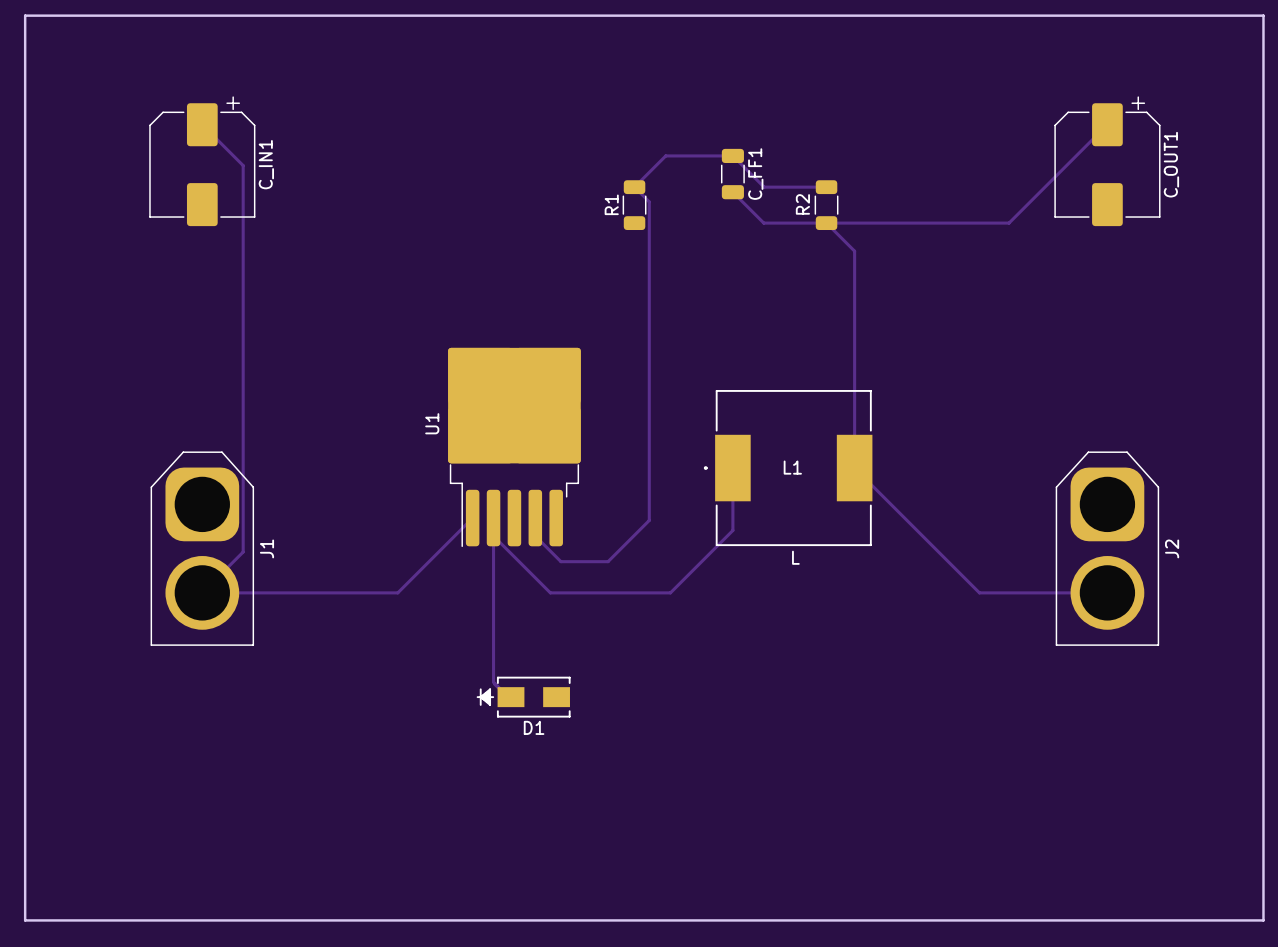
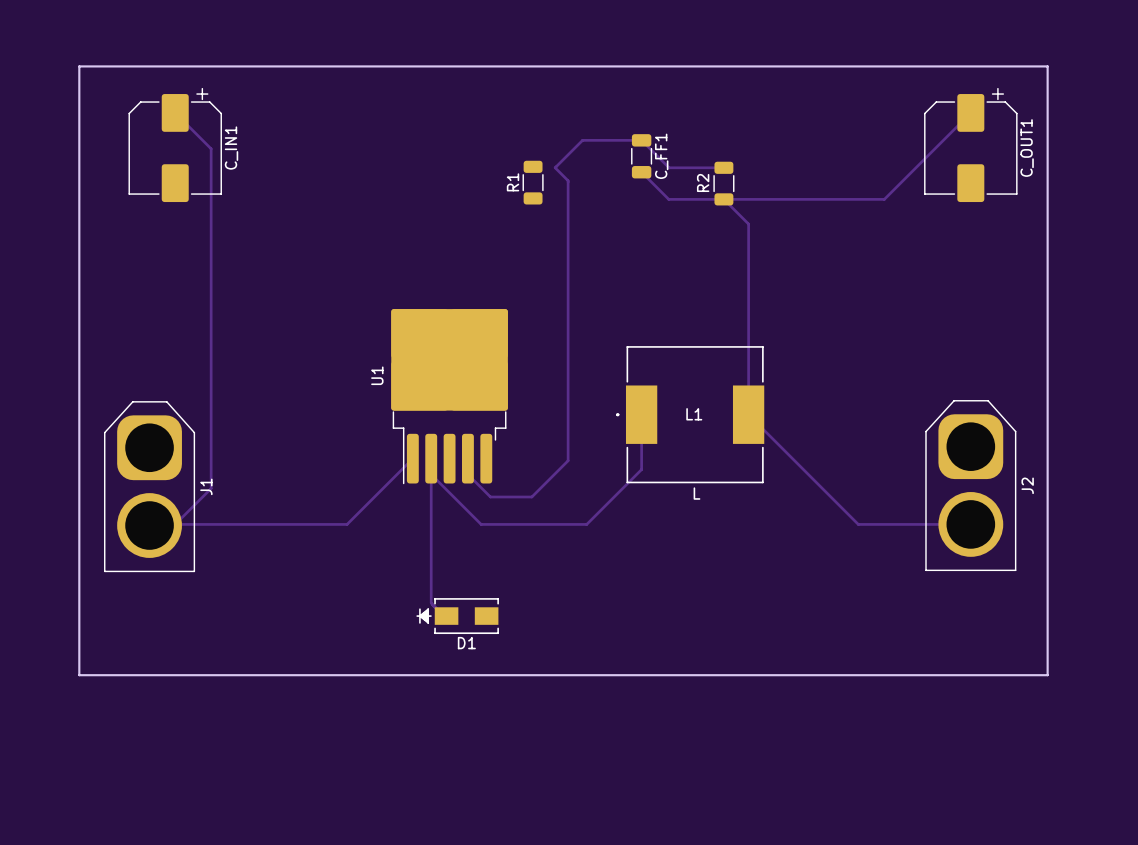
board edge: (25, 15) (1263, 15) (1263, 920) (25, 920) (25, 15) -> (79, 66) (79, 675) (1047, 675) (1047, 66) (79, 66)
R1 position: (634, 205) -> (533, 182)
J1 position: (202, 548) -> (149, 486)

